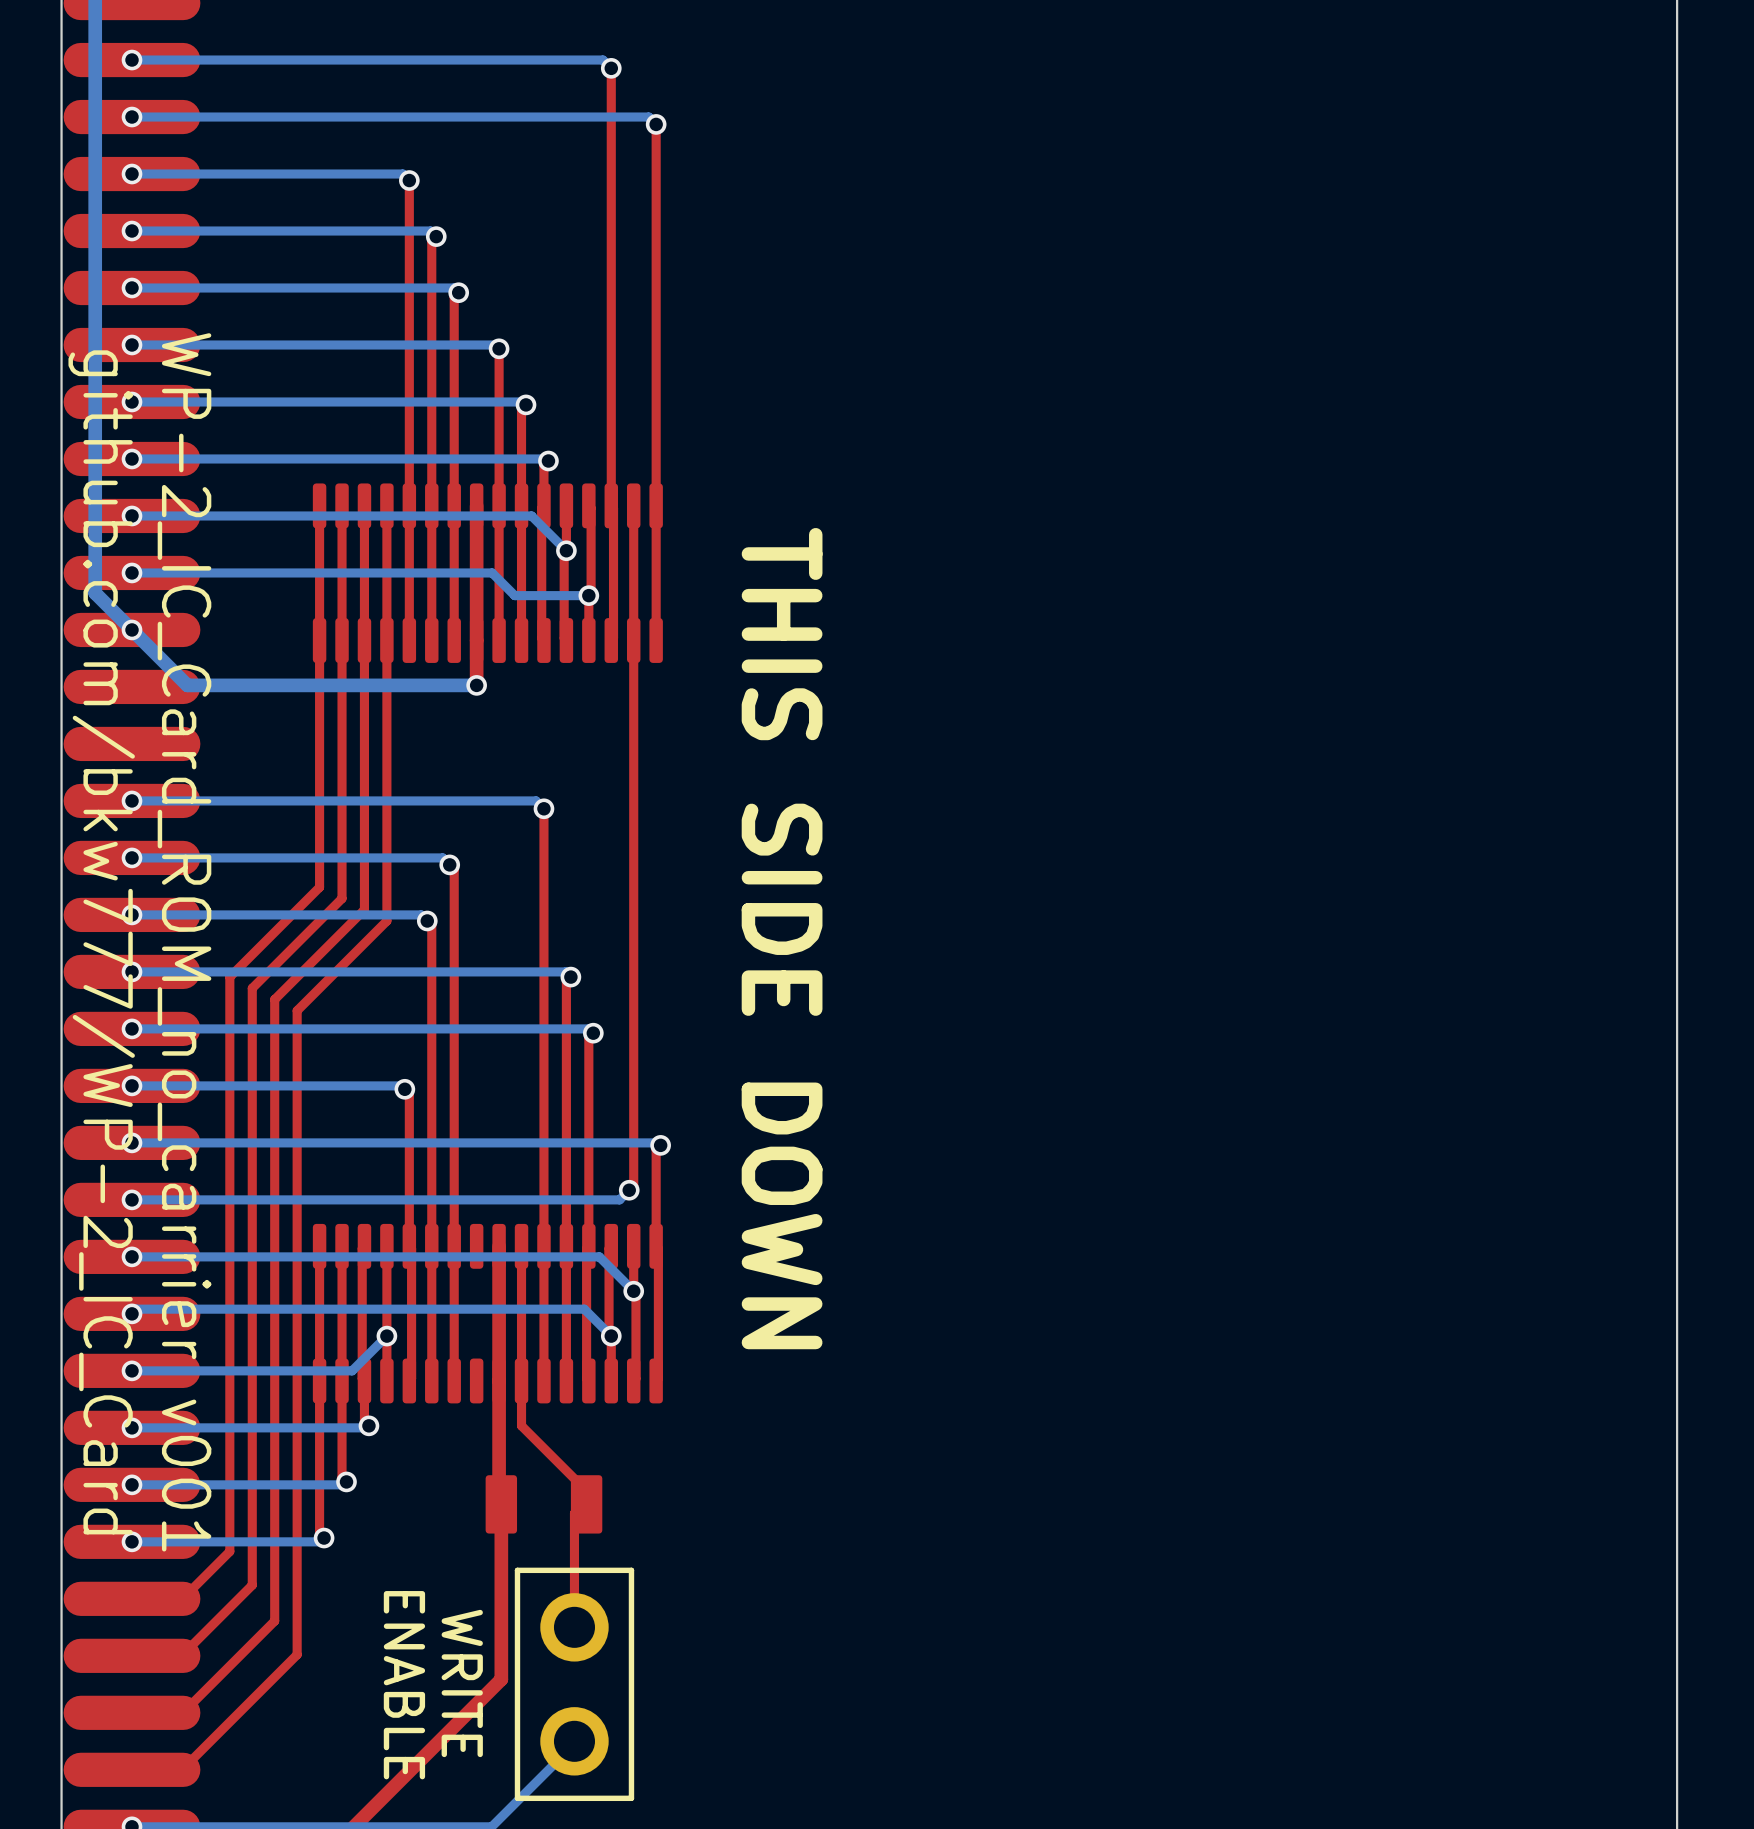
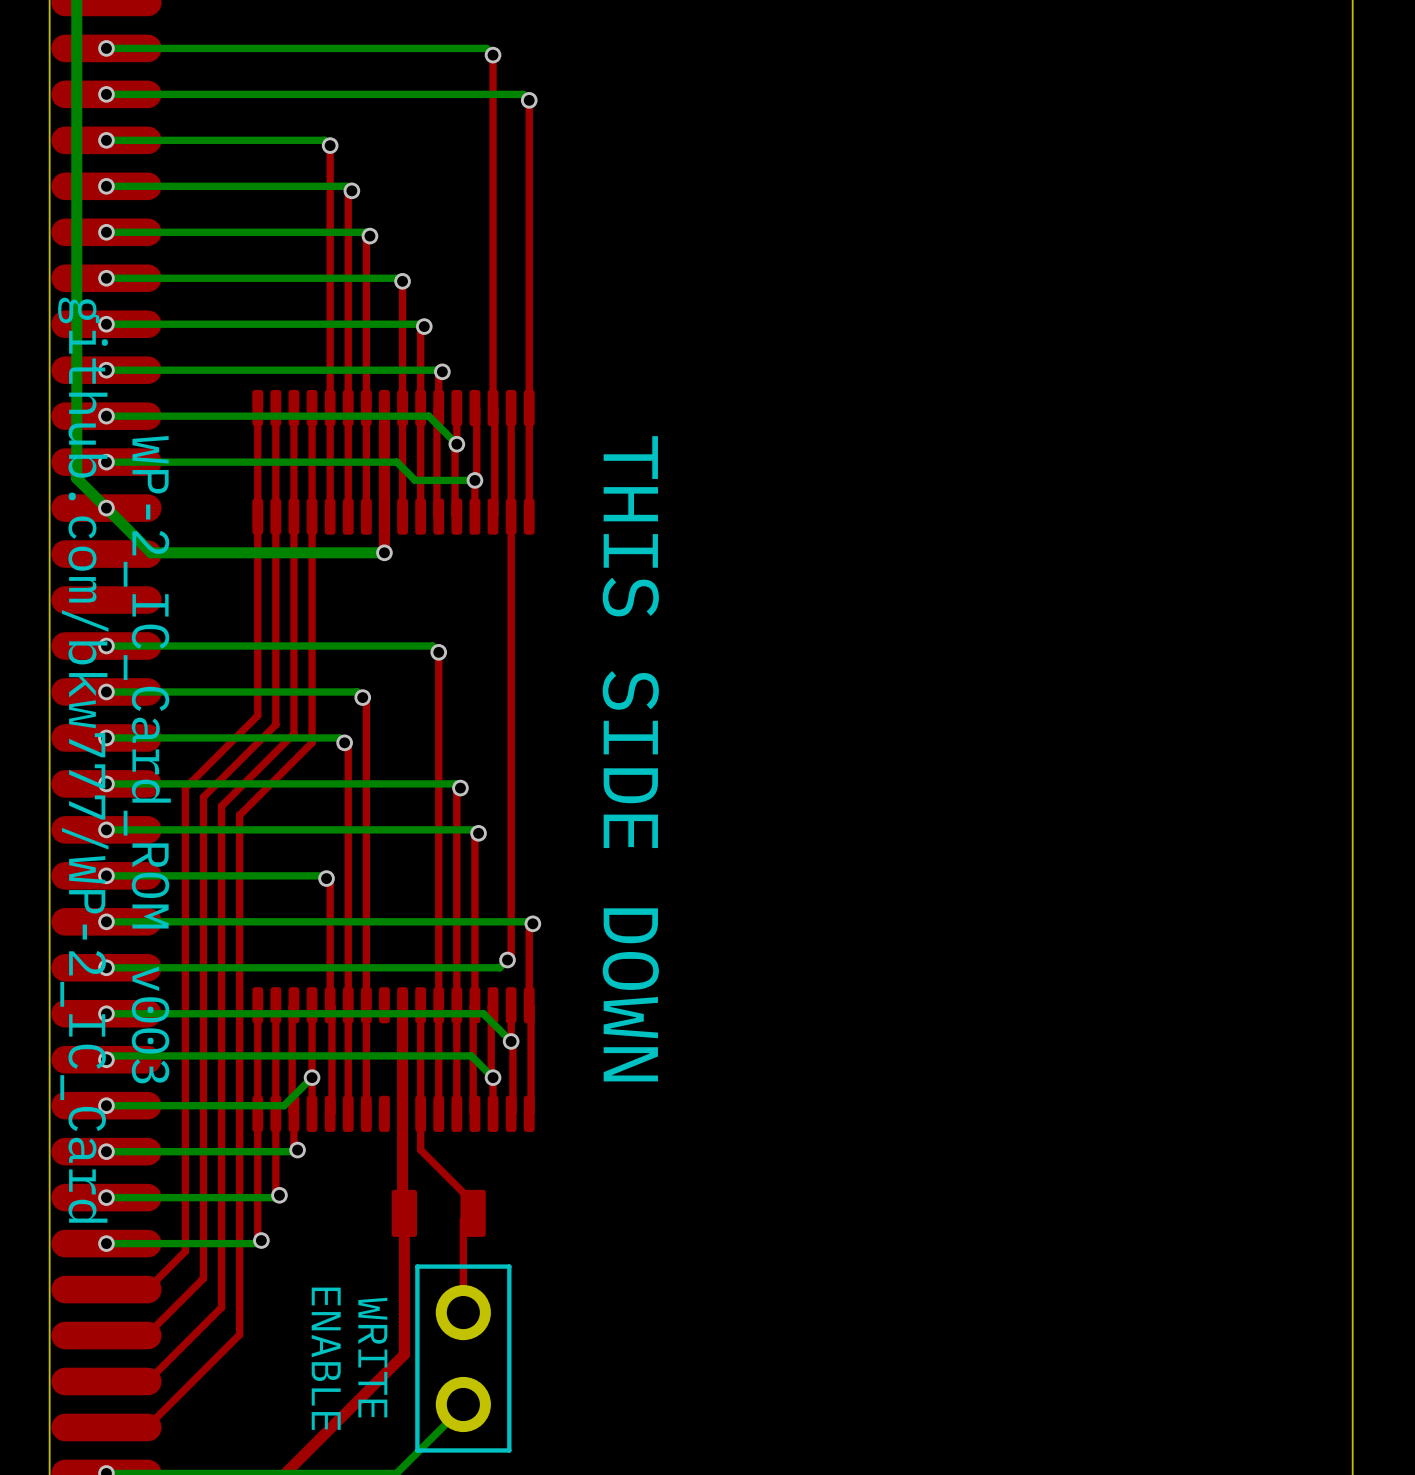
text: WP-2_IC_Card_ROM_no_carrier v001 (184, 942) -> WP-2_IC_Card_ROM v003 (147, 759)

